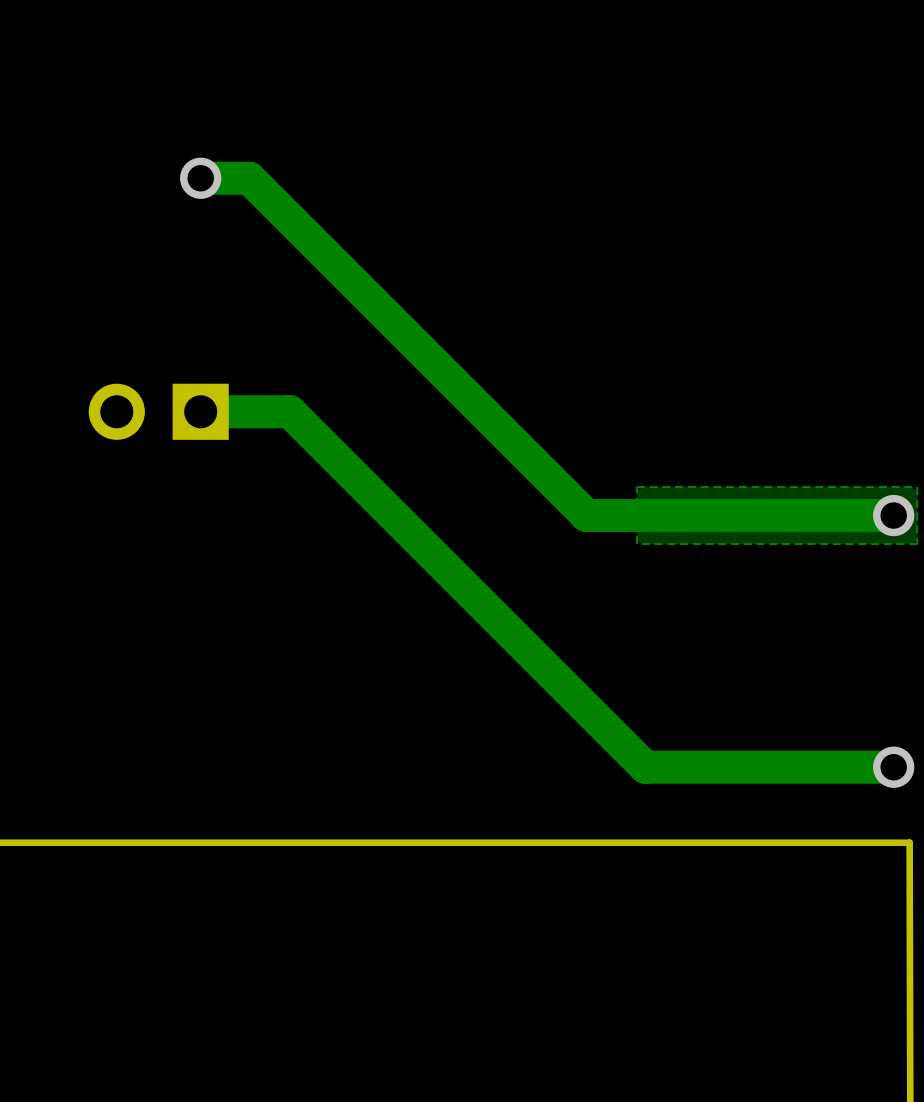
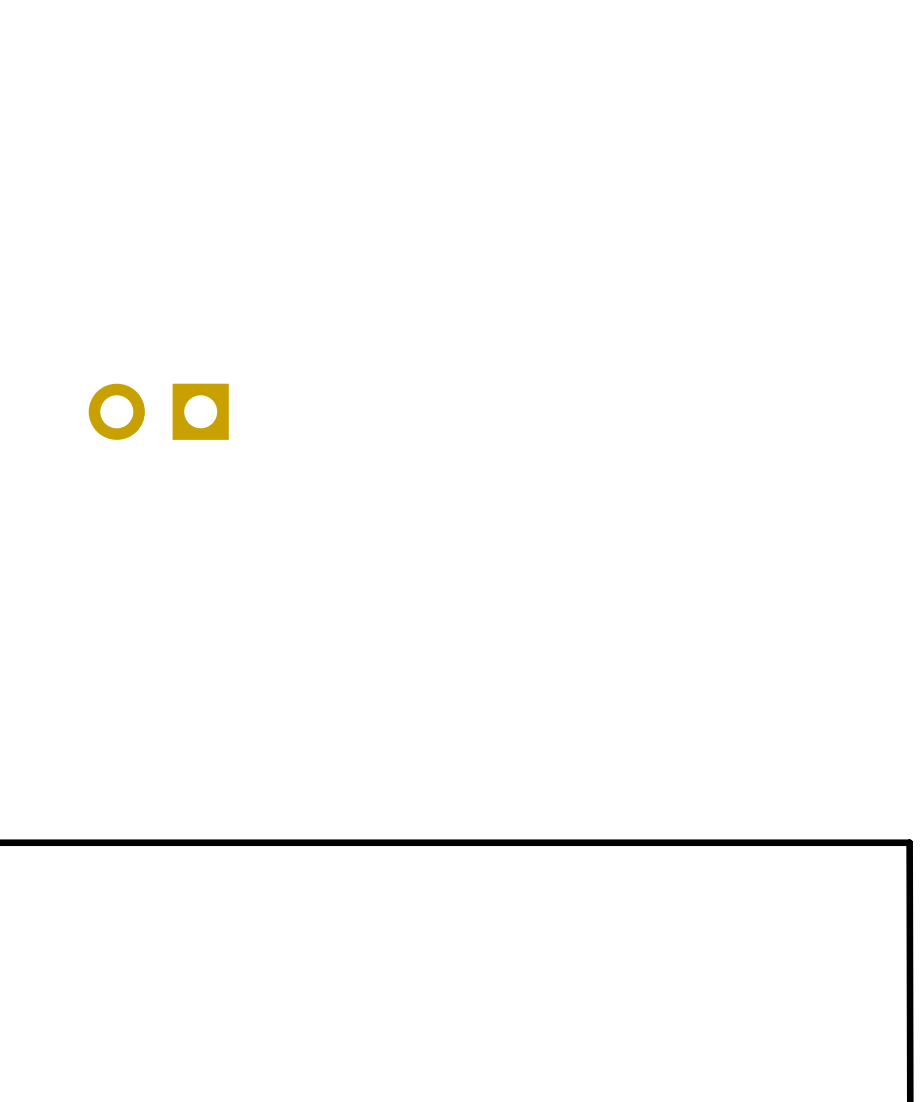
track: (200, 178) (249, 178) (586, 515) (893, 515) -> none
via: (200, 178) -> none
track: (200, 411) (289, 411) (645, 767) (893, 767) -> none
zone outline: (917, 487) (917, 544) (636, 544) (636, 487) (917, 487) -> none
via: (893, 515) -> none
via: (893, 767) -> none

